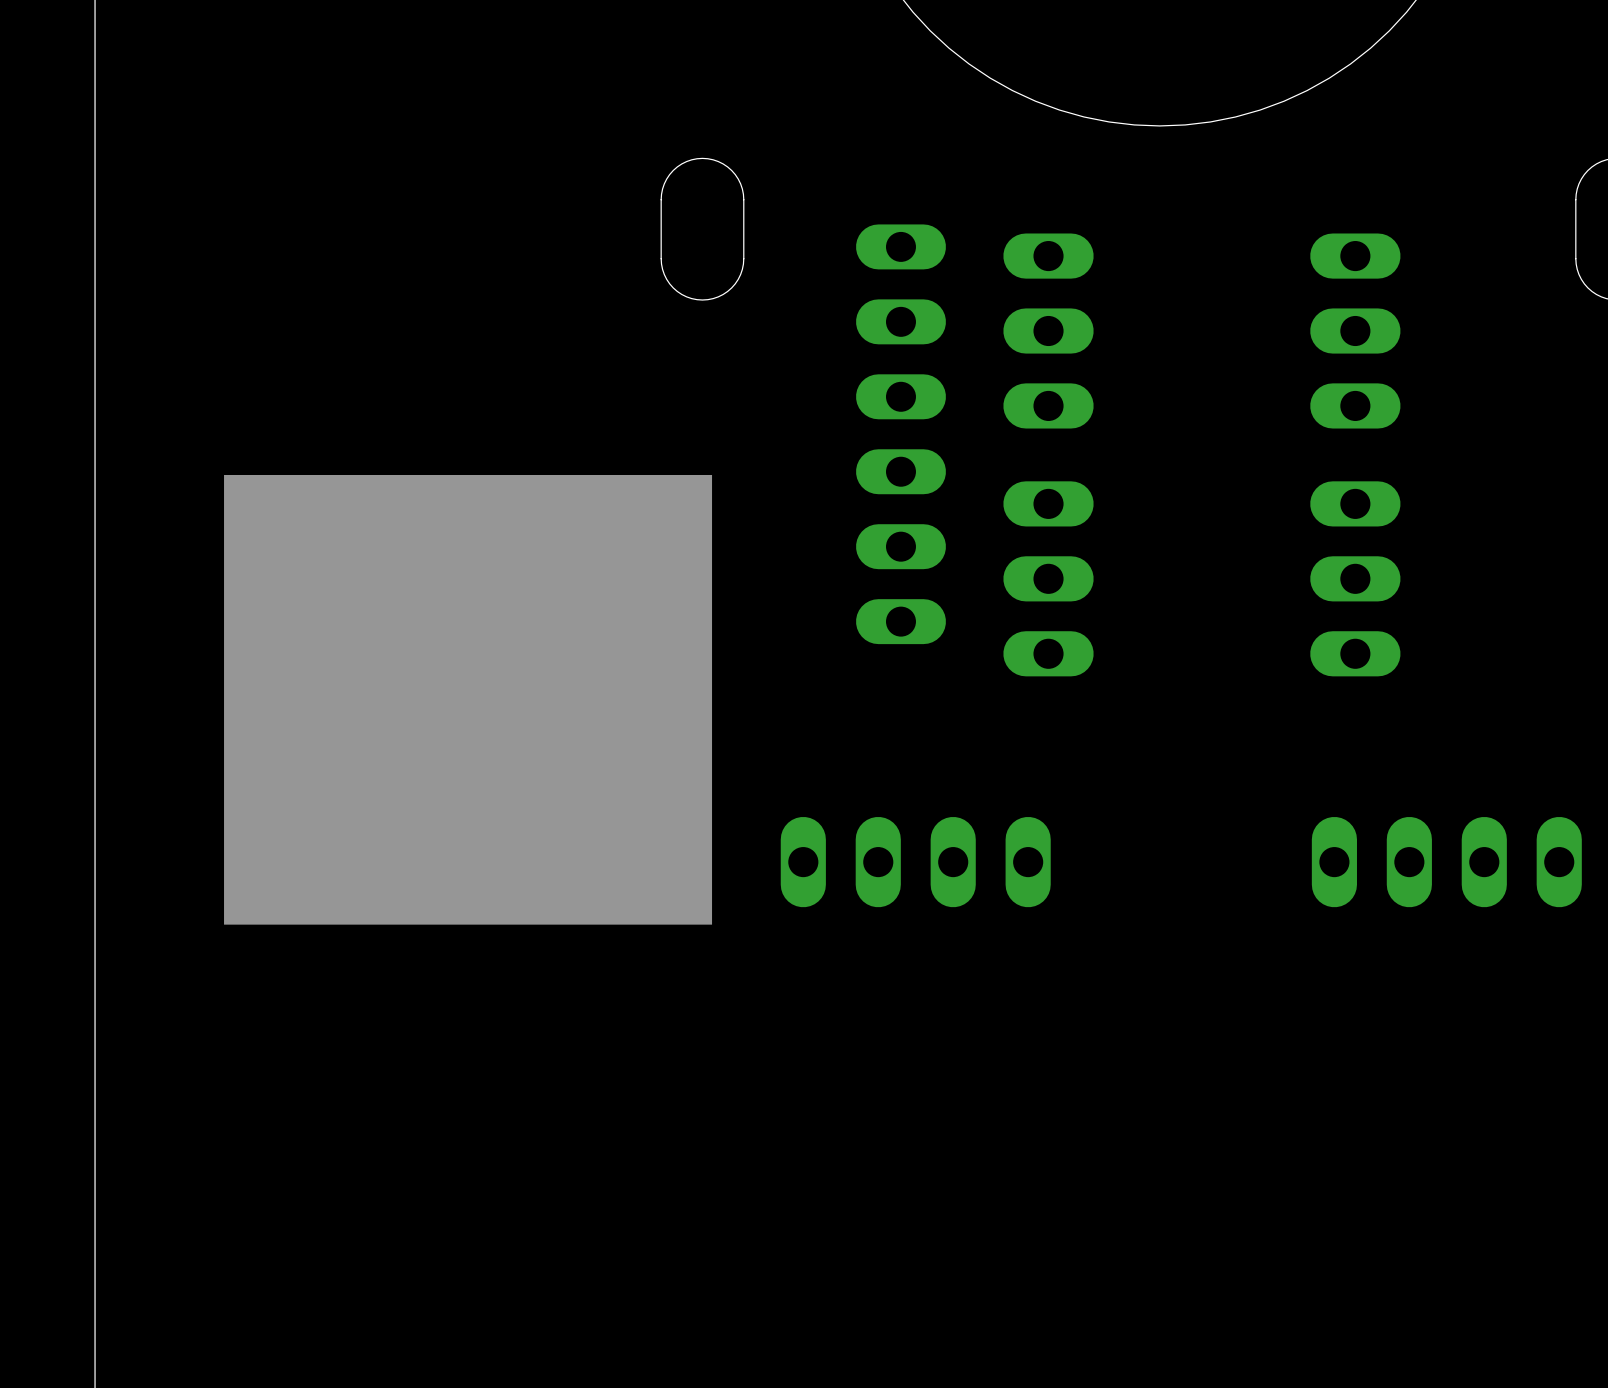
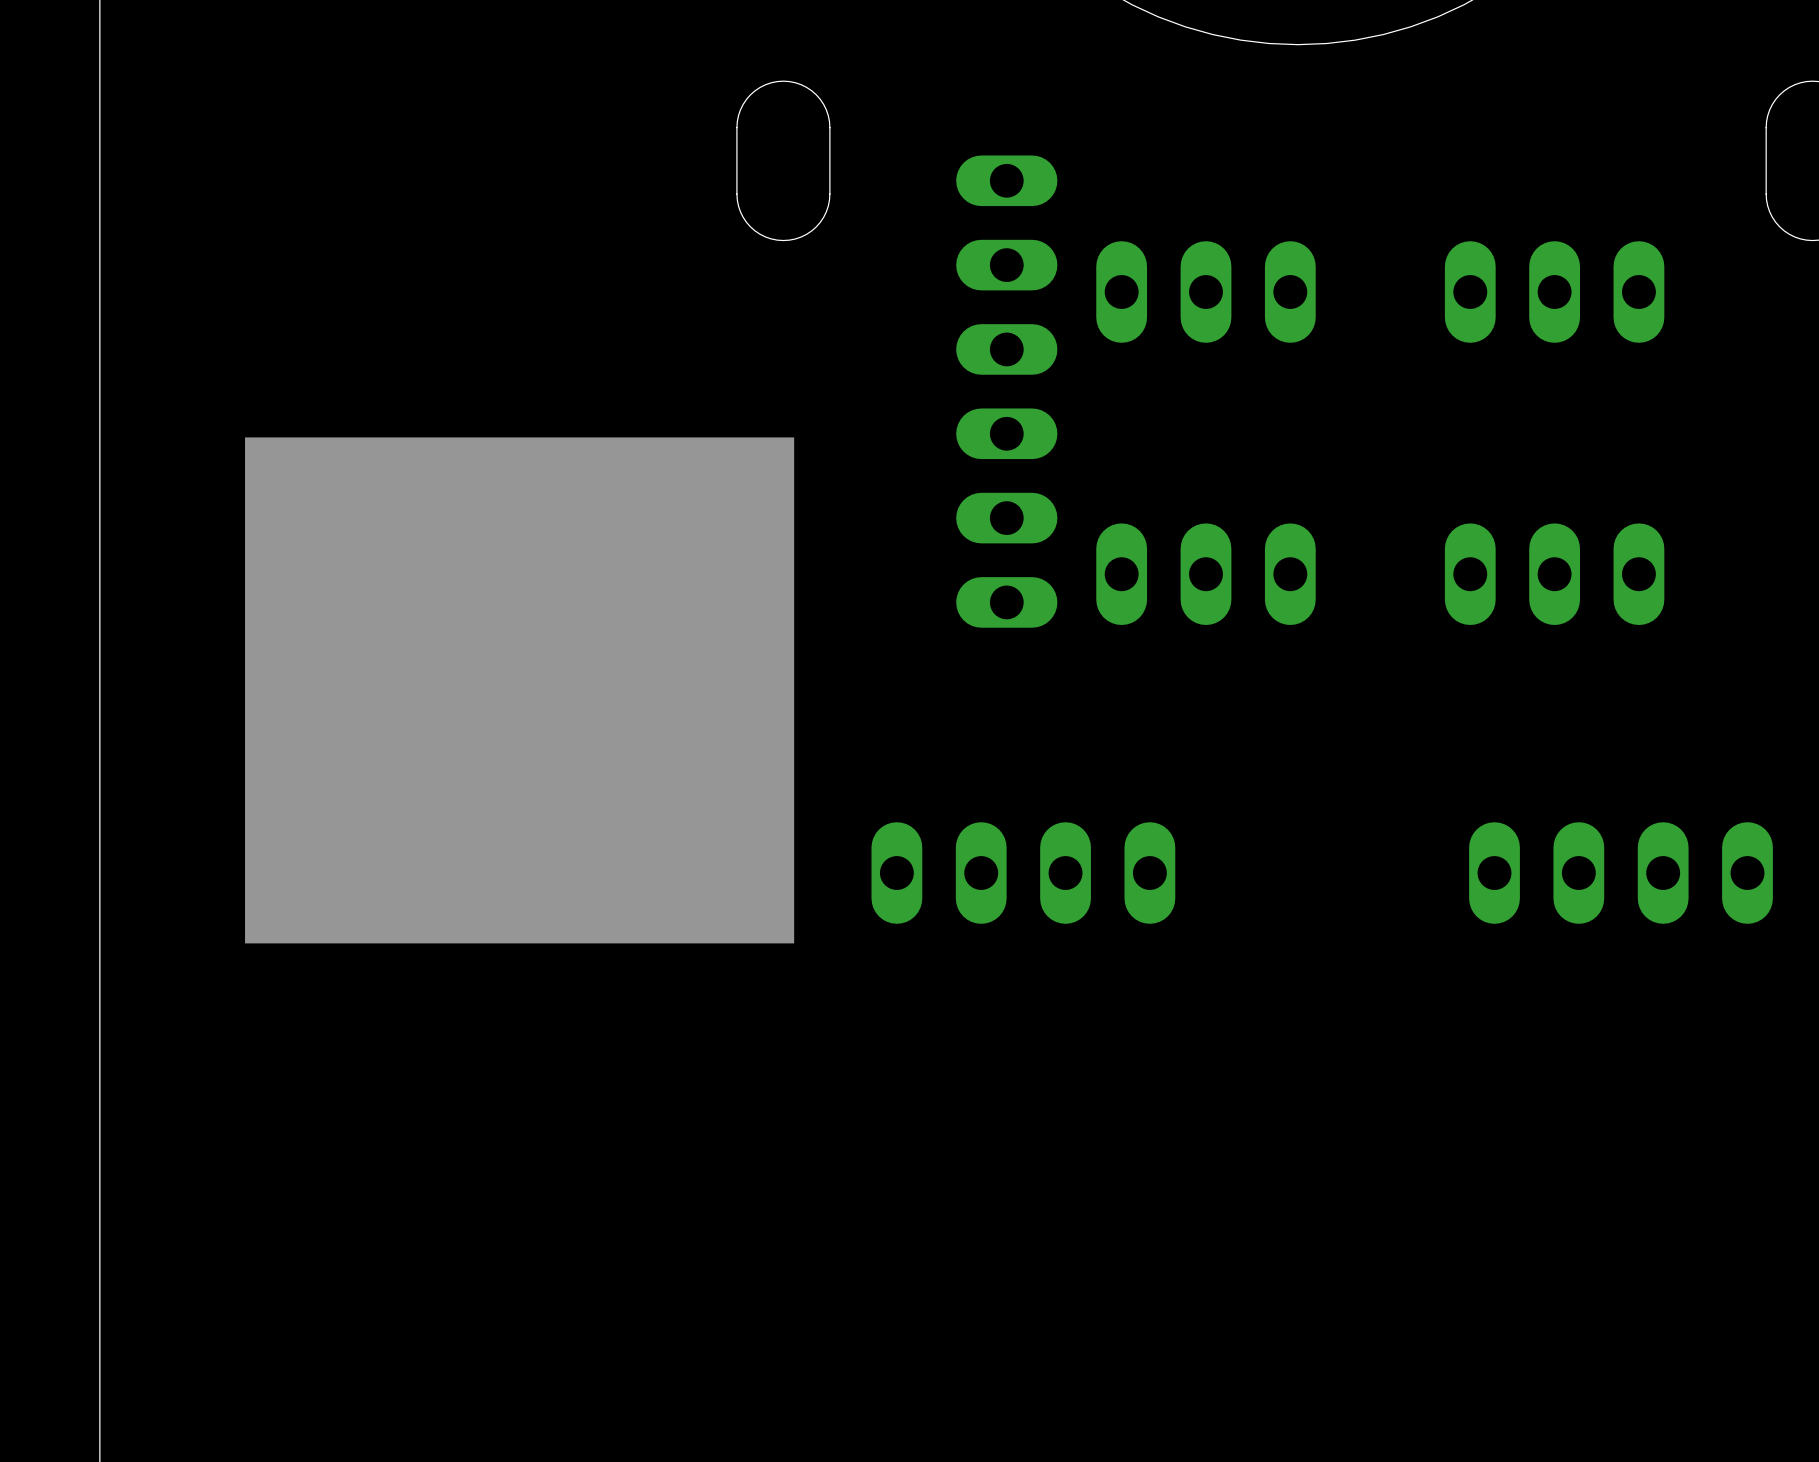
part rotation: 0° (1048, 331) -> 90° clockwise (1205, 292)
part rotation: 0° (1355, 331) -> 90° clockwise (1554, 292)
part rotation: 0° (1048, 578) -> 90° clockwise (1205, 574)
part rotation: 0° (1355, 578) -> 90° clockwise (1554, 574)

